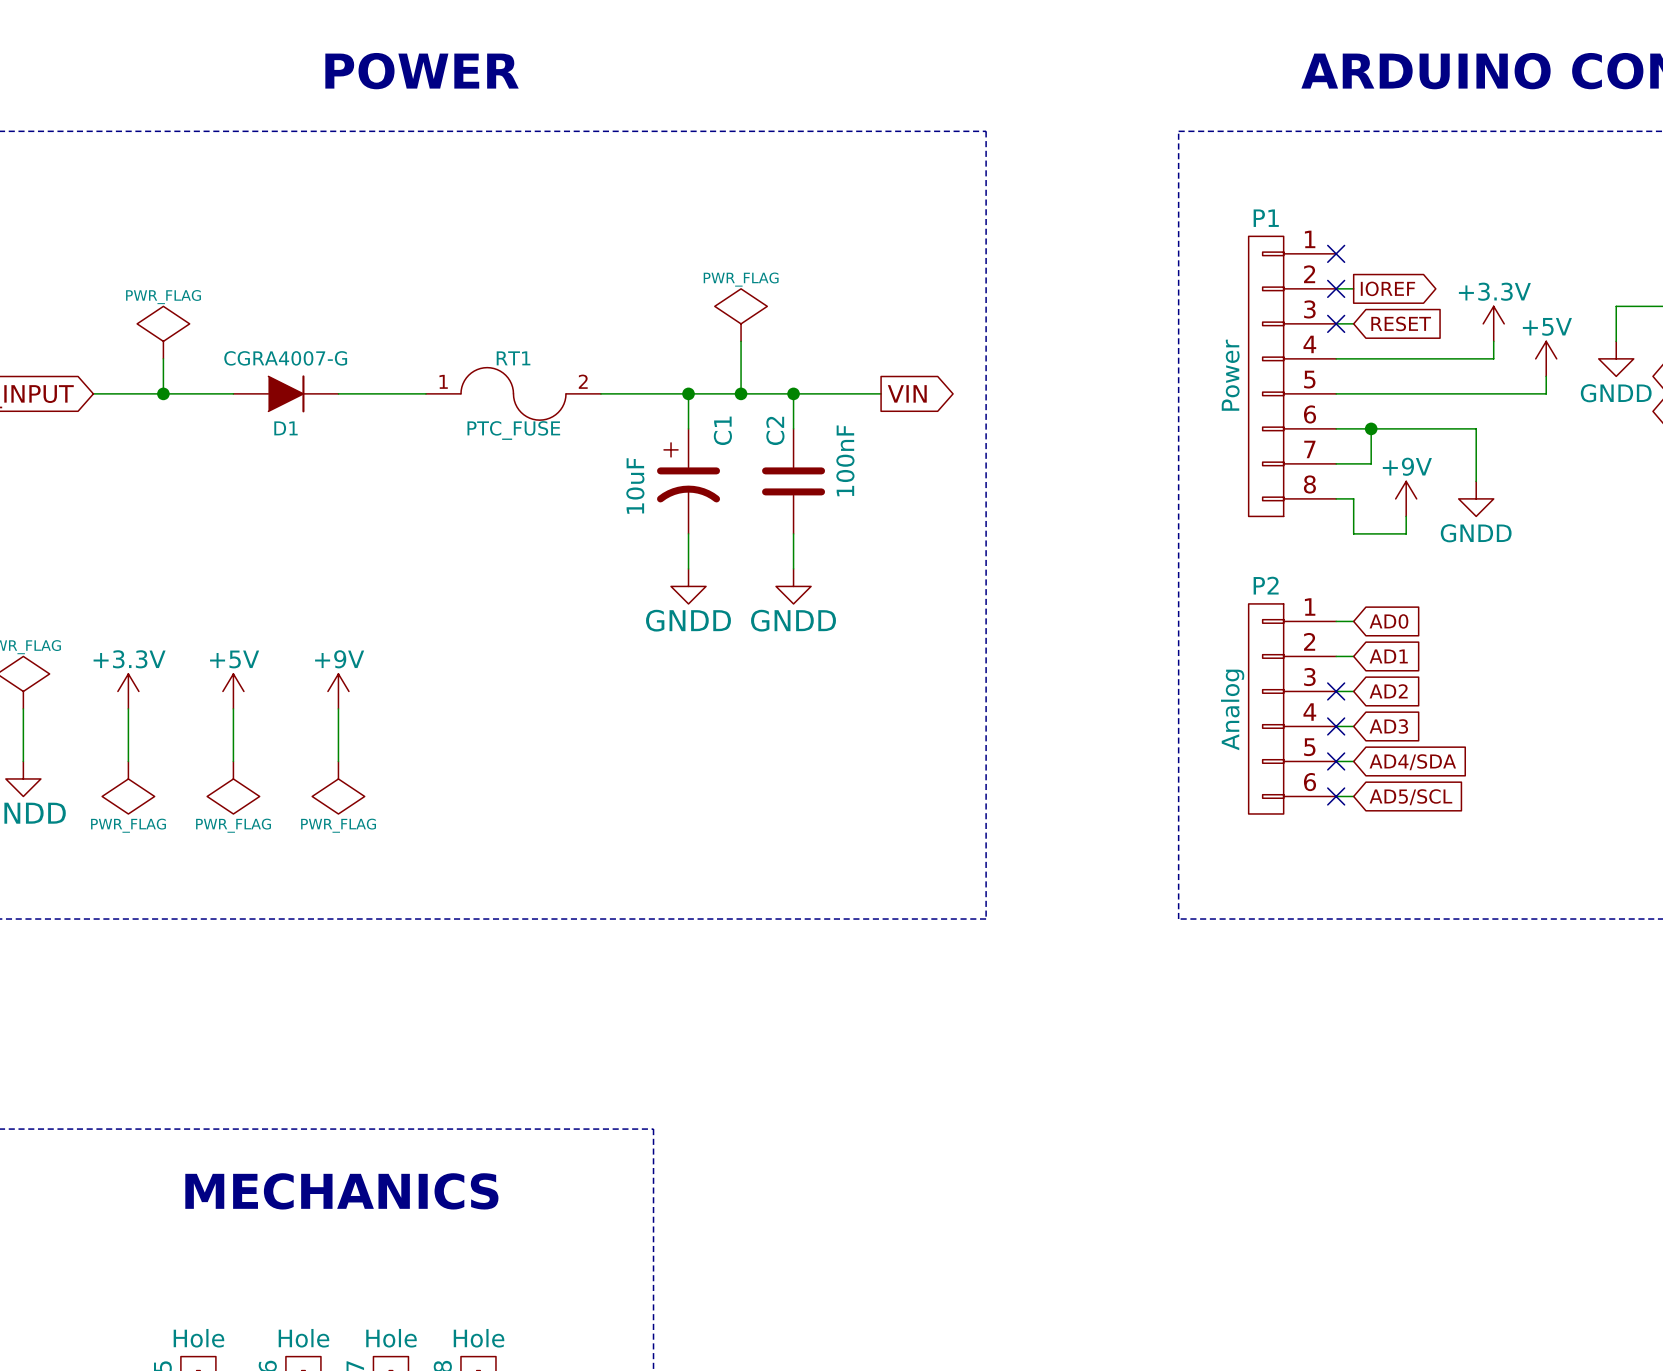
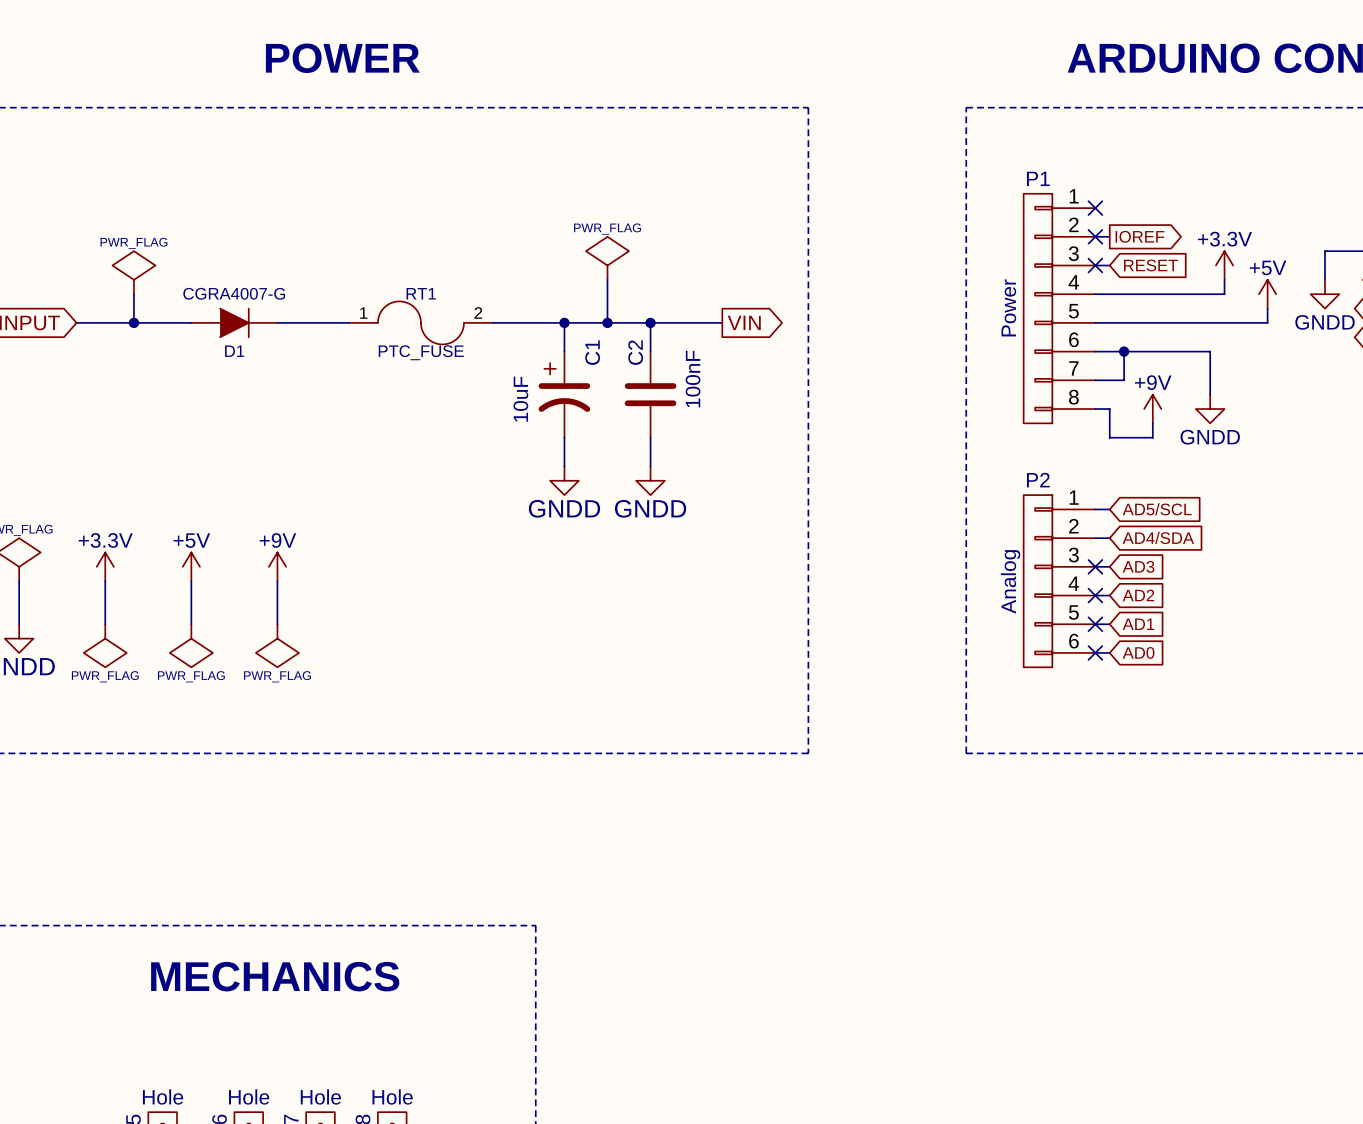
global label: AD0 (1388, 621) -> AD5/SCL (1157, 509)
global label: AD1 (1388, 656) -> AD4/SDA (1158, 537)
global label: AD2 (1388, 691) -> AD3 (1138, 566)
global label: AD3 (1388, 726) -> AD2 (1138, 595)
global label: AD4/SDA (1412, 762) -> AD1 (1138, 624)
global label: AD5/SCL (1410, 797) -> AD0 (1138, 652)

